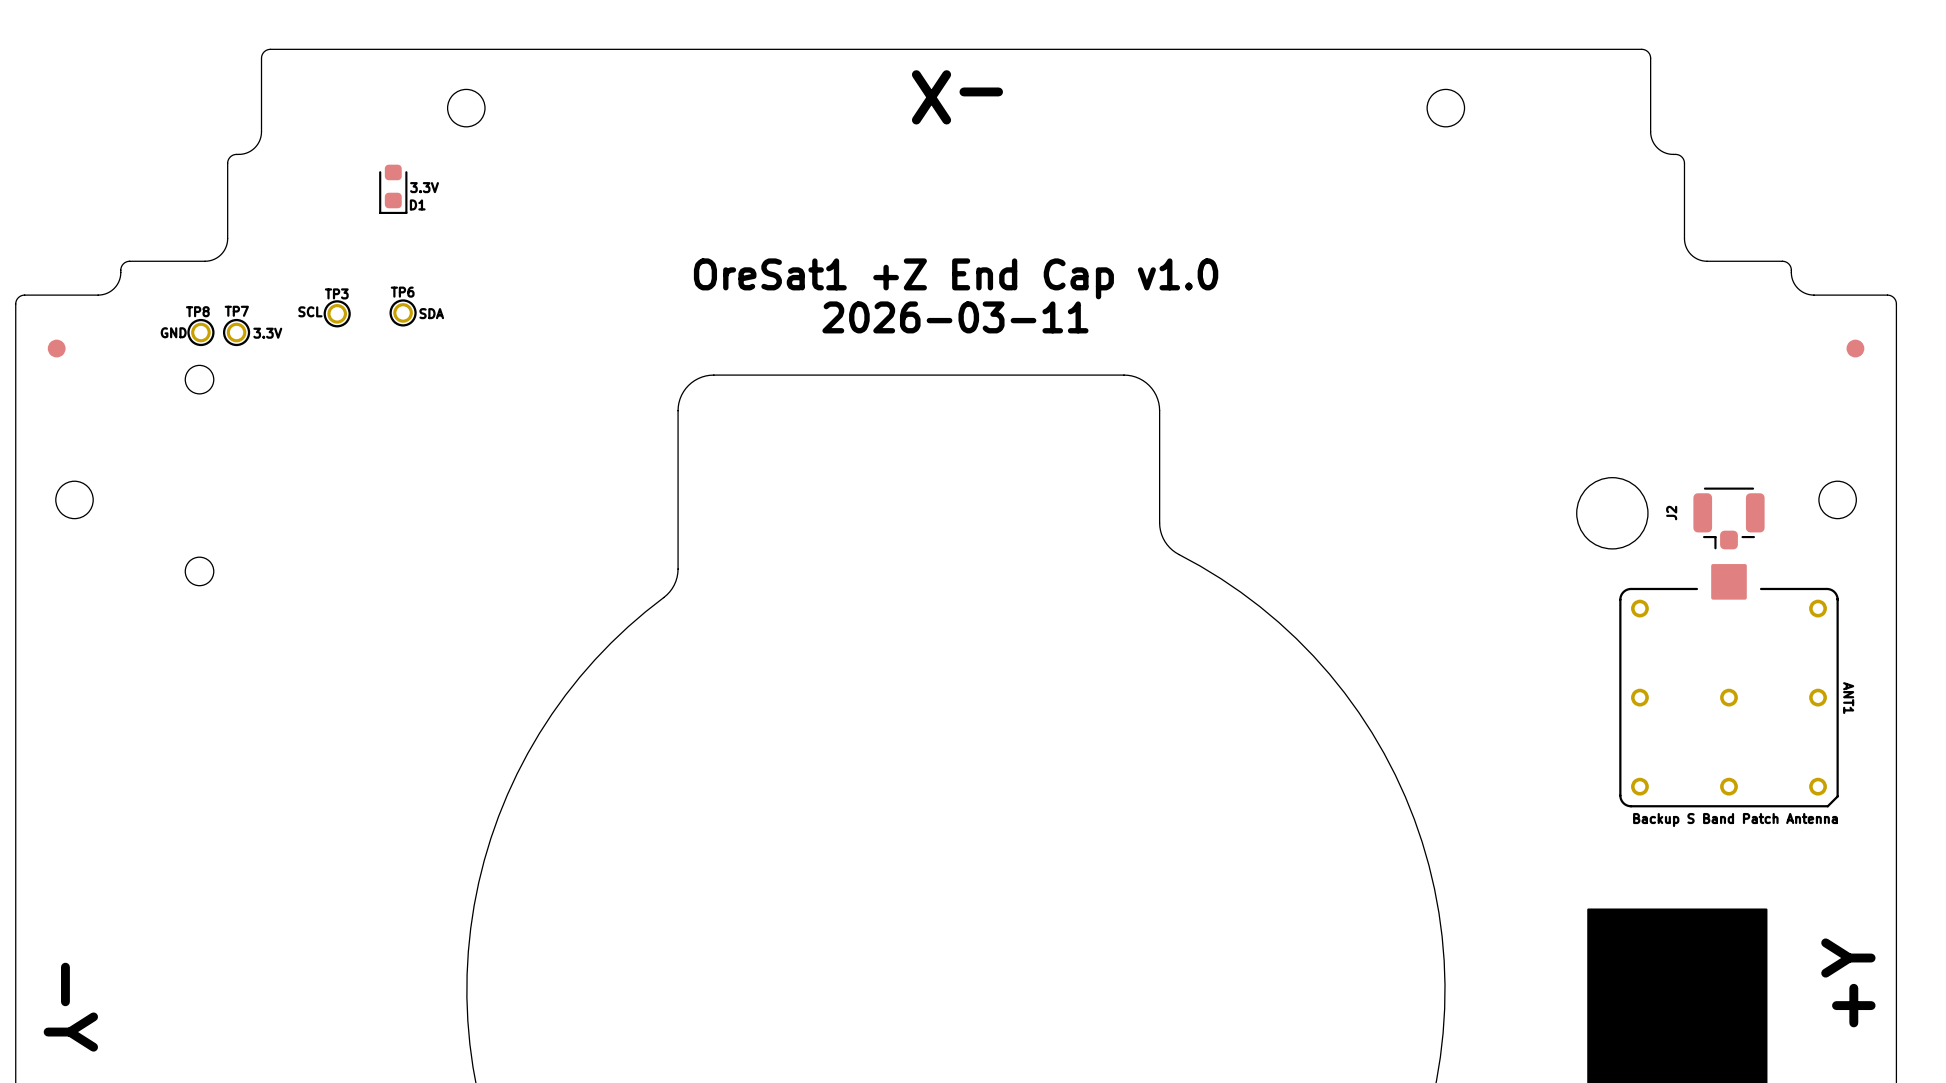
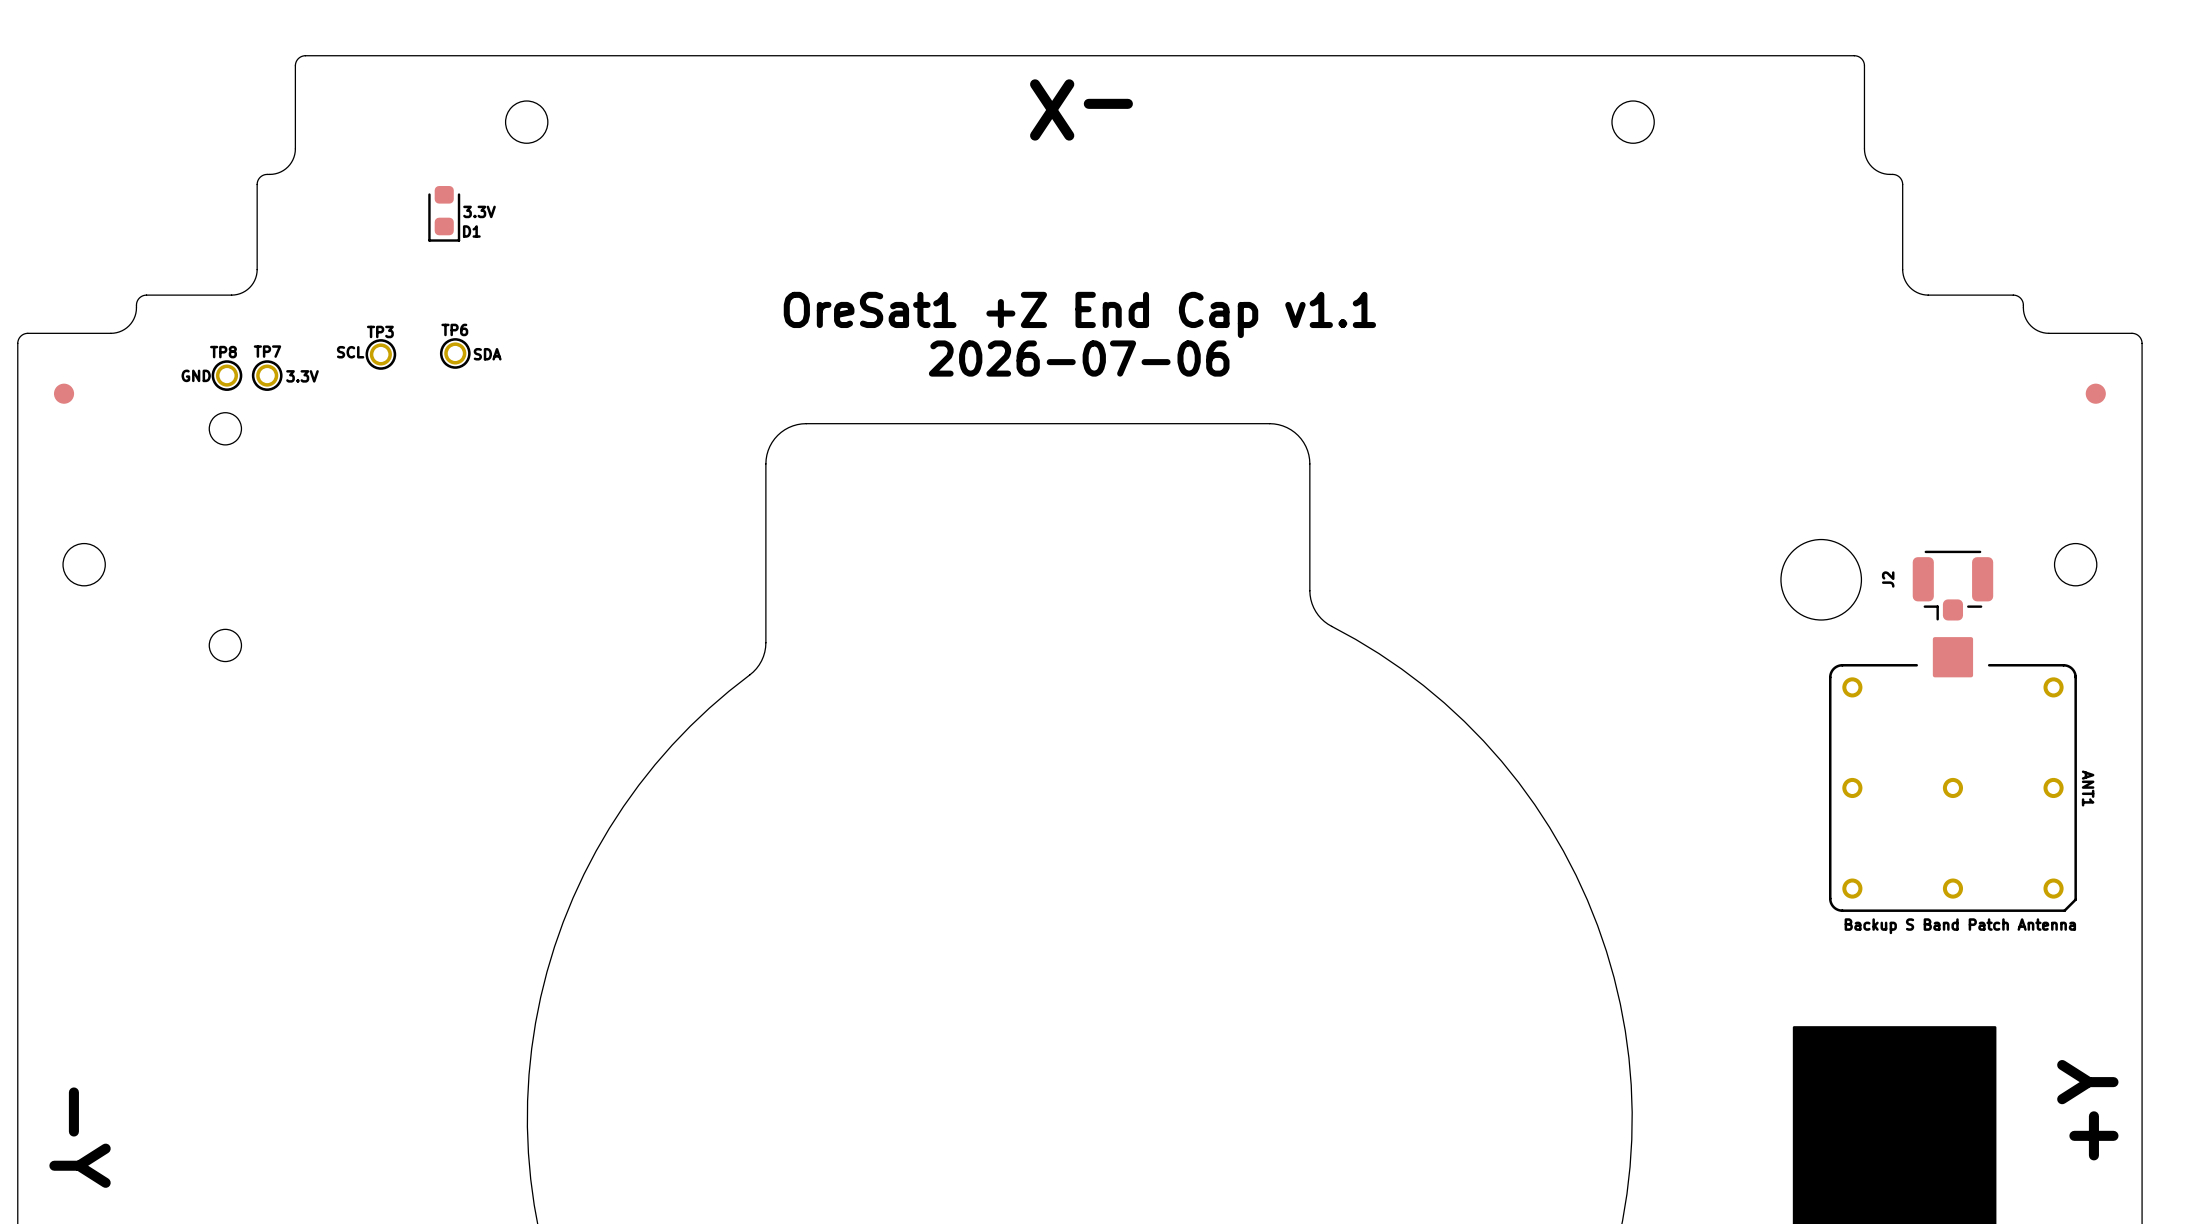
text: OreSat1 +Z End Cap v1.0 (956, 278) -> OreSat1 +Z End Cap v1.1 (1079, 314)
text: 2026-03-11 (955, 317) -> 2026-07-06 (1079, 358)

